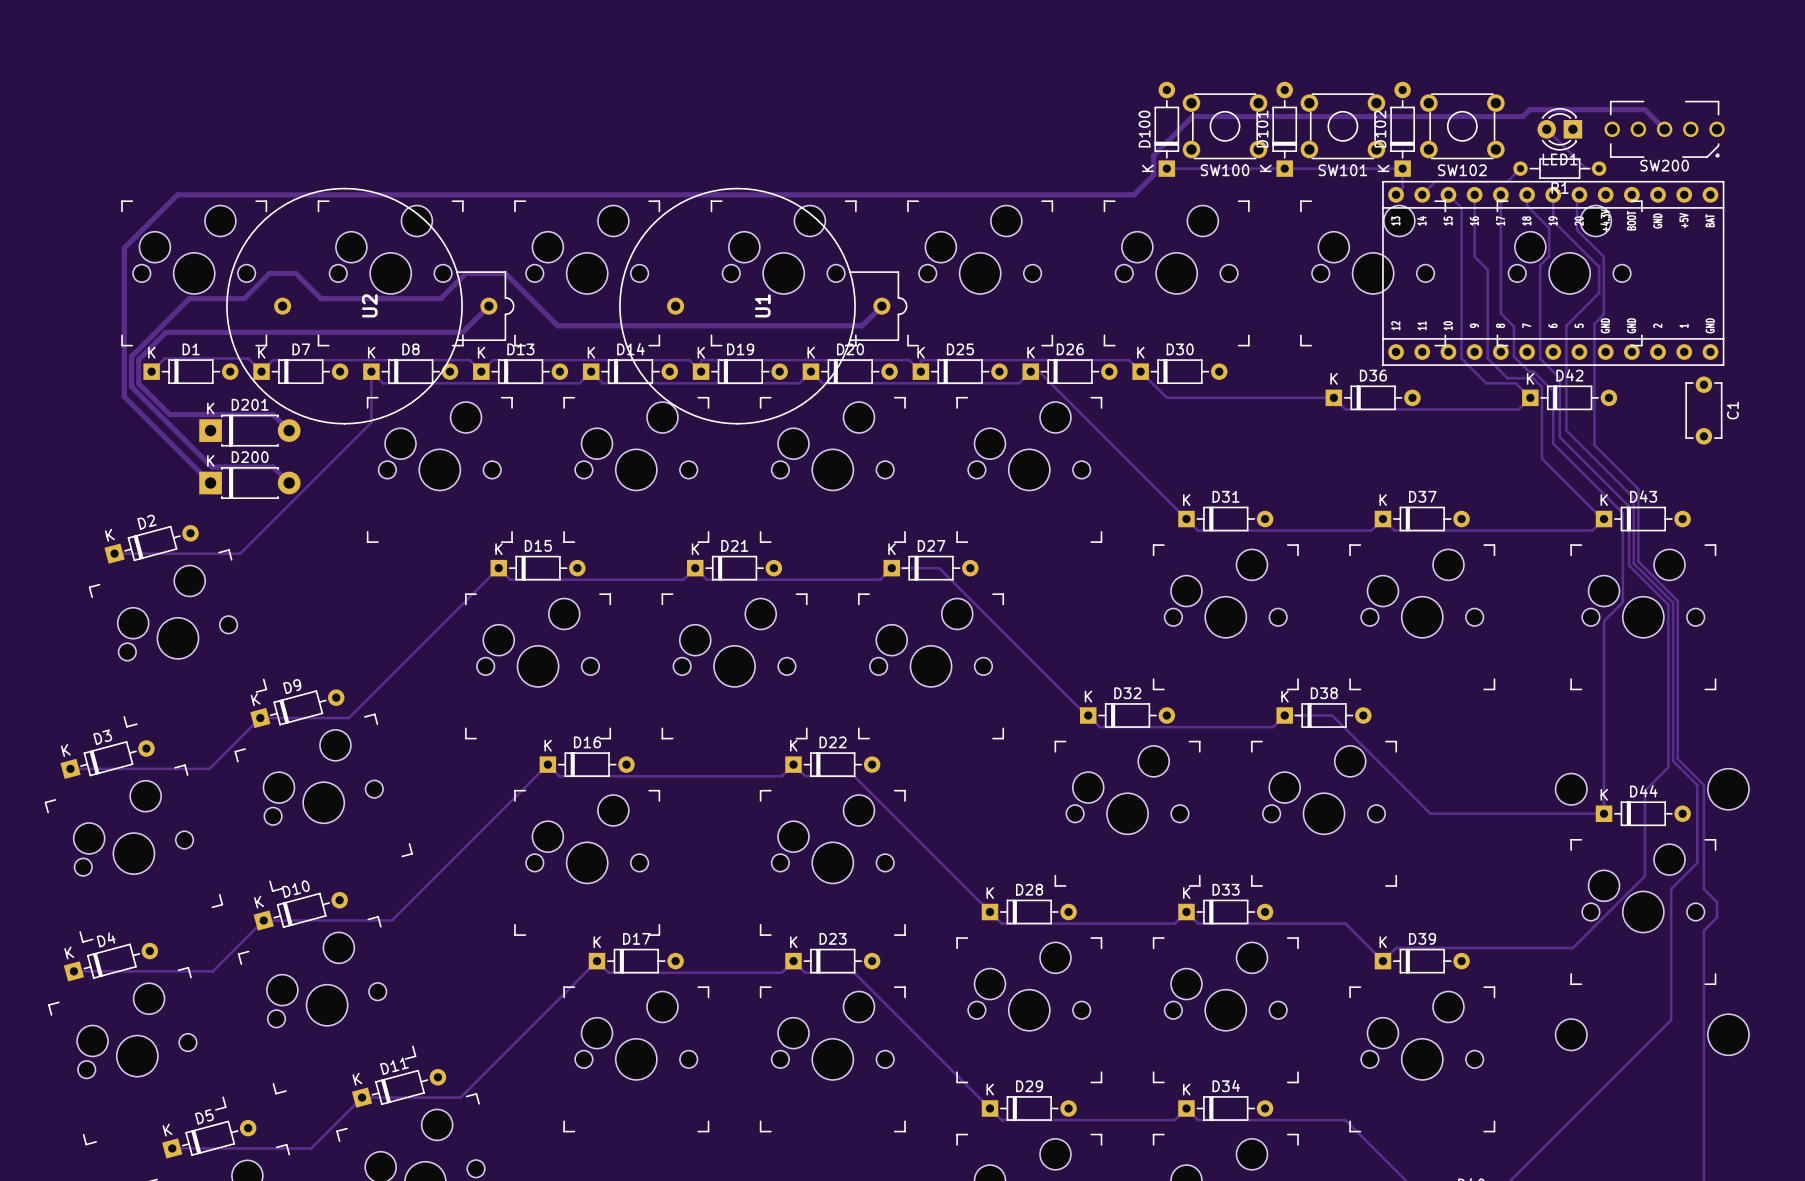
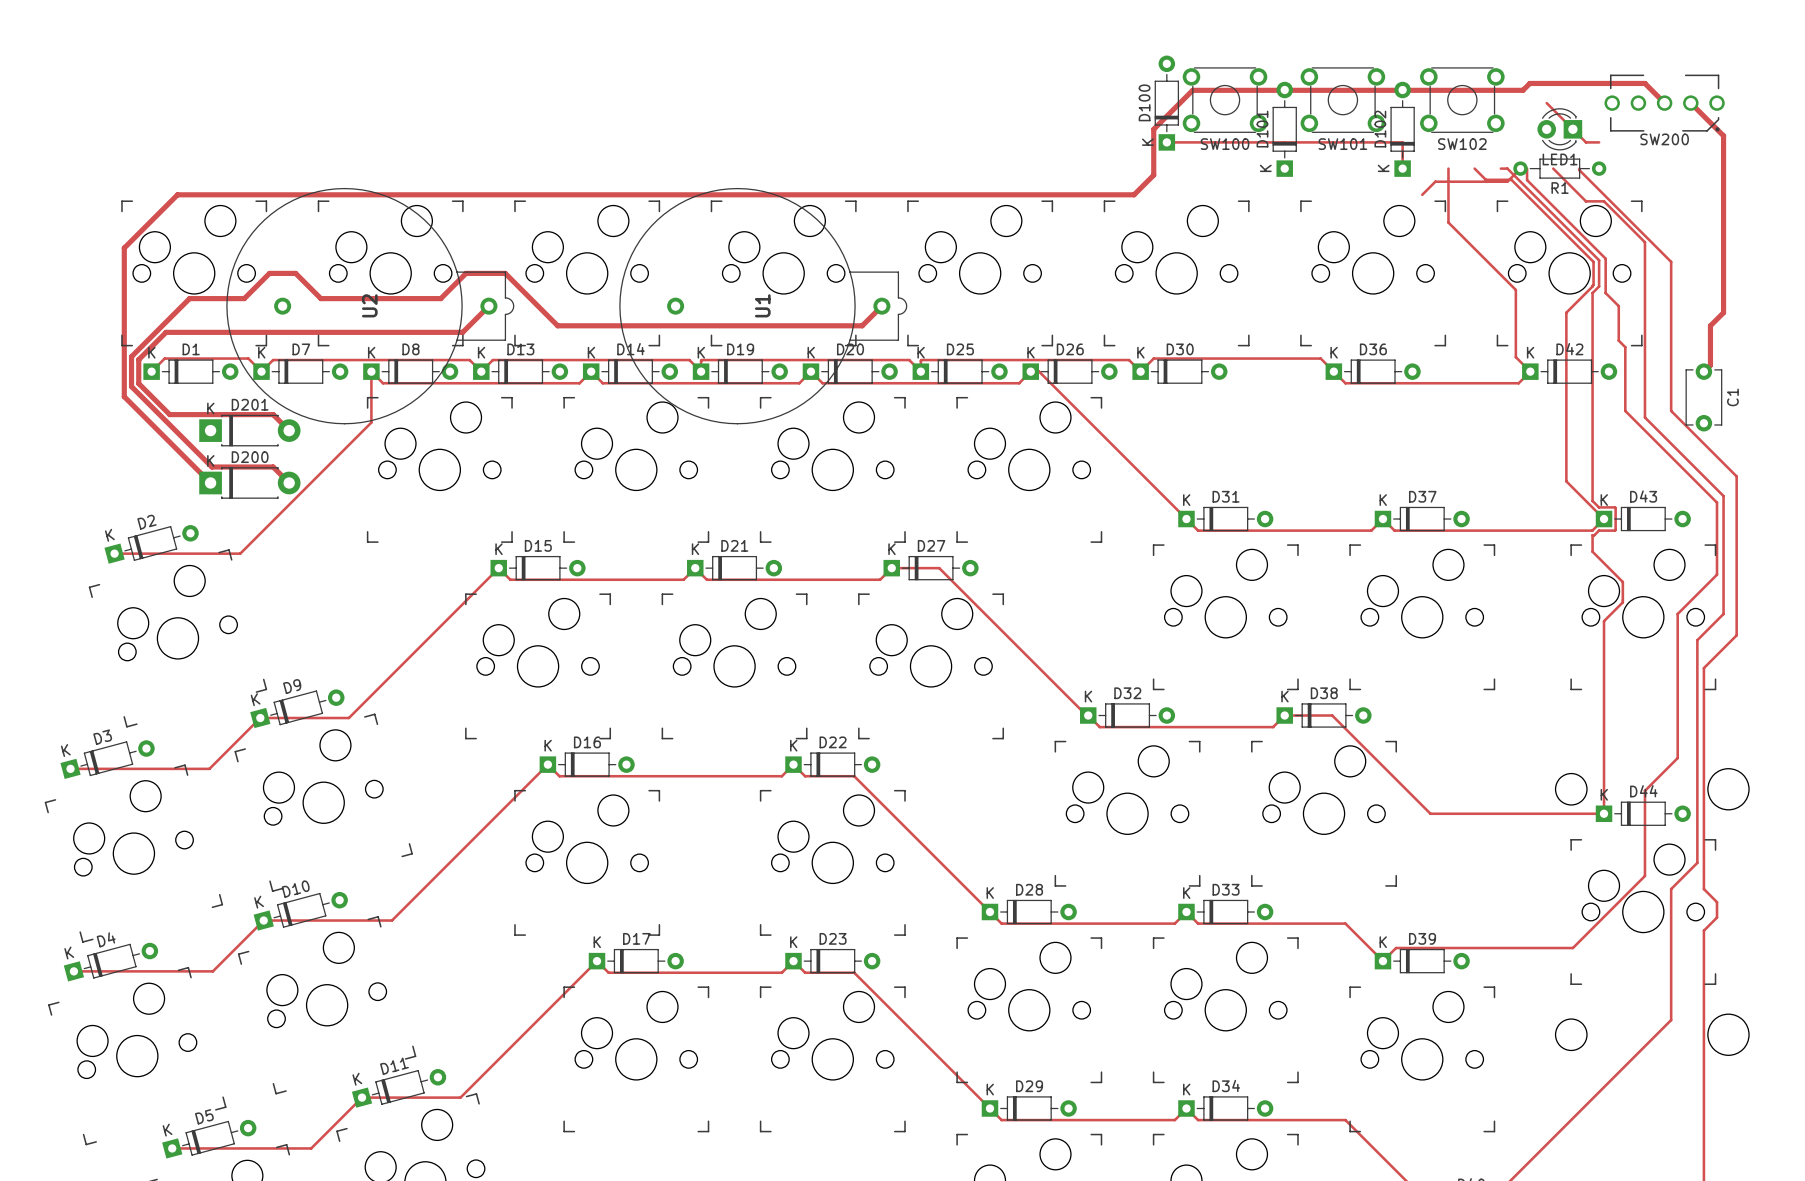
track: none -> (1690, 103) (1723, 135) (1723, 312) (1710, 325) (1710, 365) (1703, 371)
SW100 position: (1225, 126) -> (1225, 100)
SW101 position: (1342, 126) -> (1342, 100)
SW102 position: (1462, 126) -> (1462, 100)
D100 position: (1166, 129) -> (1166, 103)
track: (1546, 129) (1586, 168) (1599, 168) -> (1546, 103) (1586, 142) (1599, 142)
track: (1664, 129) (1644, 109) (1529, 109) (1523, 116) (1192, 116) (1153, 155) -> (1664, 103) (1644, 83) (1529, 83) (1523, 90) (1192, 90) (1153, 129) (1153, 155)
SW200 position: (1664, 129) -> (1664, 103)
track: (1166, 168) (1402, 168) (1402, 188) (1396, 194) -> (1166, 142) (1402, 142) (1402, 162) (1396, 168)
track: none -> (1579, 168) (1671, 261) (1671, 410) (1736, 476) (1736, 635) (1703, 668) (1703, 785)
track: (1448, 194) (1461, 207) (1461, 358) (1486, 383) (1515, 383) (1530, 397) (1518, 409) (1345, 409) (1333, 397) (1166, 397) (1140, 371) -> (1448, 168) (1448, 222) (1515, 289) (1515, 357) (1530, 371) (1518, 383) (1345, 383) (1320, 358) (1153, 358) (1140, 371)
track: (1474, 194) (1474, 256) (1487, 269) (1487, 358) (1507, 378) (1533, 378) (1541, 386) (1541, 458) (1604, 519) -> (1566, 430) (1566, 481) (1604, 519)
track: (1500, 194) (1500, 313) (1513, 326) (1513, 356) (1528, 371) (1533, 371) (1553, 391) (1553, 443) (1622, 513) (1622, 582) -> (1599, 286) (1592, 293) (1592, 500) (1598, 507) (1615, 508) (1615, 529) (1598, 530) (1592, 535) (1592, 551) (1622, 582)
track: (1527, 194) (1527, 205) (1549, 228) (1549, 256) (1540, 265) (1540, 358) (1559, 378) (1559, 437) (1629, 506) (1629, 565) (1668, 604) (1668, 767) -> none
track: (1553, 194) (1553, 221) (1599, 266) -> (1500, 168) (1507, 168) (1599, 260) (1599, 266)
track: (1579, 194) (1577, 197) (1577, 230) -> (1527, 168) (1527, 180) (1577, 230)
track: (1603, 256) (1603, 314) (1594, 323) (1594, 445) (1638, 489) (1638, 561) (1677, 600) (1677, 613) -> (1603, 256) (1605, 258) (1605, 293) (1618, 306) (1618, 340) (1625, 347) (1625, 410) (1717, 502) (1717, 574) (1677, 613)
part: (1553, 273) -> none
track: (1599, 286) (1599, 293) (1566, 325) -> (1474, 168) (1485, 179) (1511, 179) (1593, 261) (1593, 284) (1566, 312) (1566, 325)
D36 position: (1373, 397) -> (1373, 371)
D42 position: (1569, 397) -> (1569, 371)
C1 position: (1703, 410) -> (1703, 397)
track: (1566, 430) (1633, 498) (1633, 563) (1673, 602) (1673, 760) (1697, 785) -> (1553, 168) (1586, 201) (1604, 201) (1644, 242) (1644, 417) (1723, 496) (1723, 613) (1697, 640) (1697, 785)
track: (1677, 758) (1703, 785) -> (1677, 758) (1668, 767)

